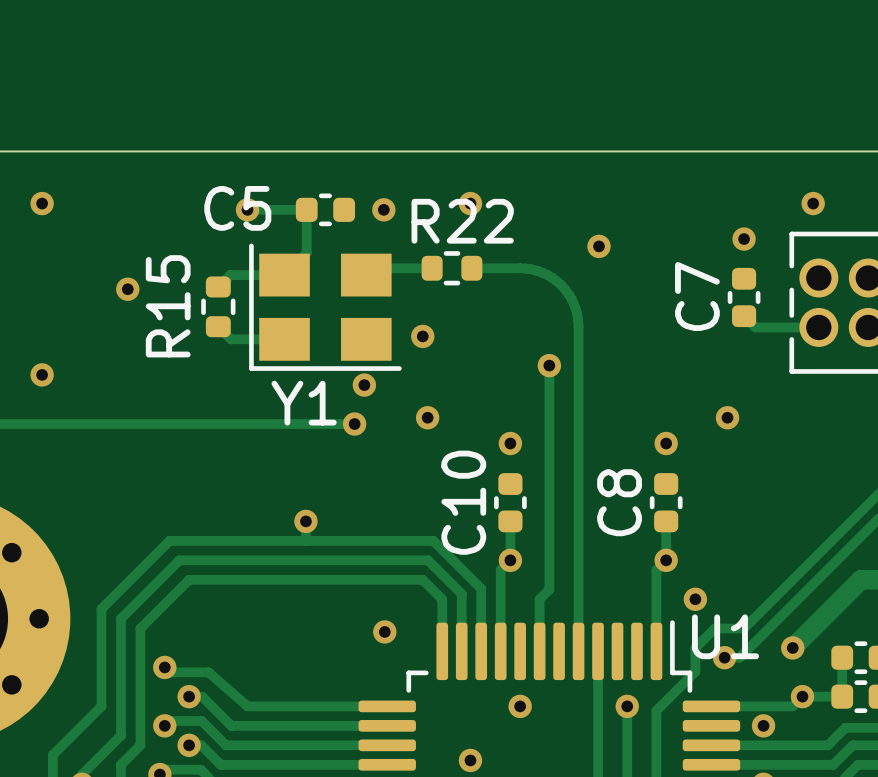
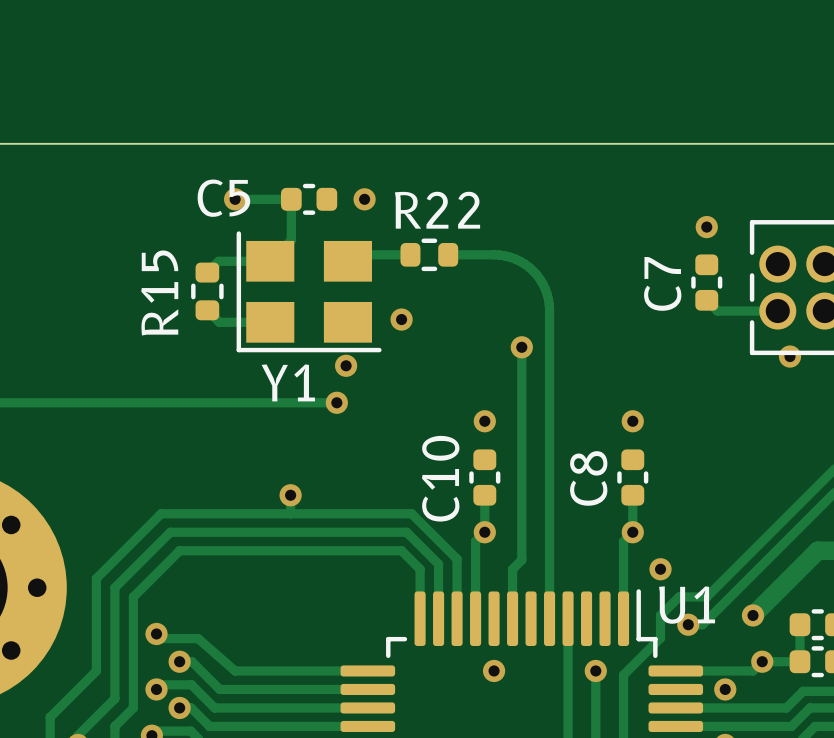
via: (42, 203) -> none
via: (470, 203) -> none
via: (813, 203) -> none
via: (599, 246) -> none
via: (127, 289) -> none
via: (42, 374) -> none
via: none -> (790, 356)
via: (427, 417) -> none
via: (727, 417) -> none
via: (384, 631) -> none
via: (470, 760) -> none

